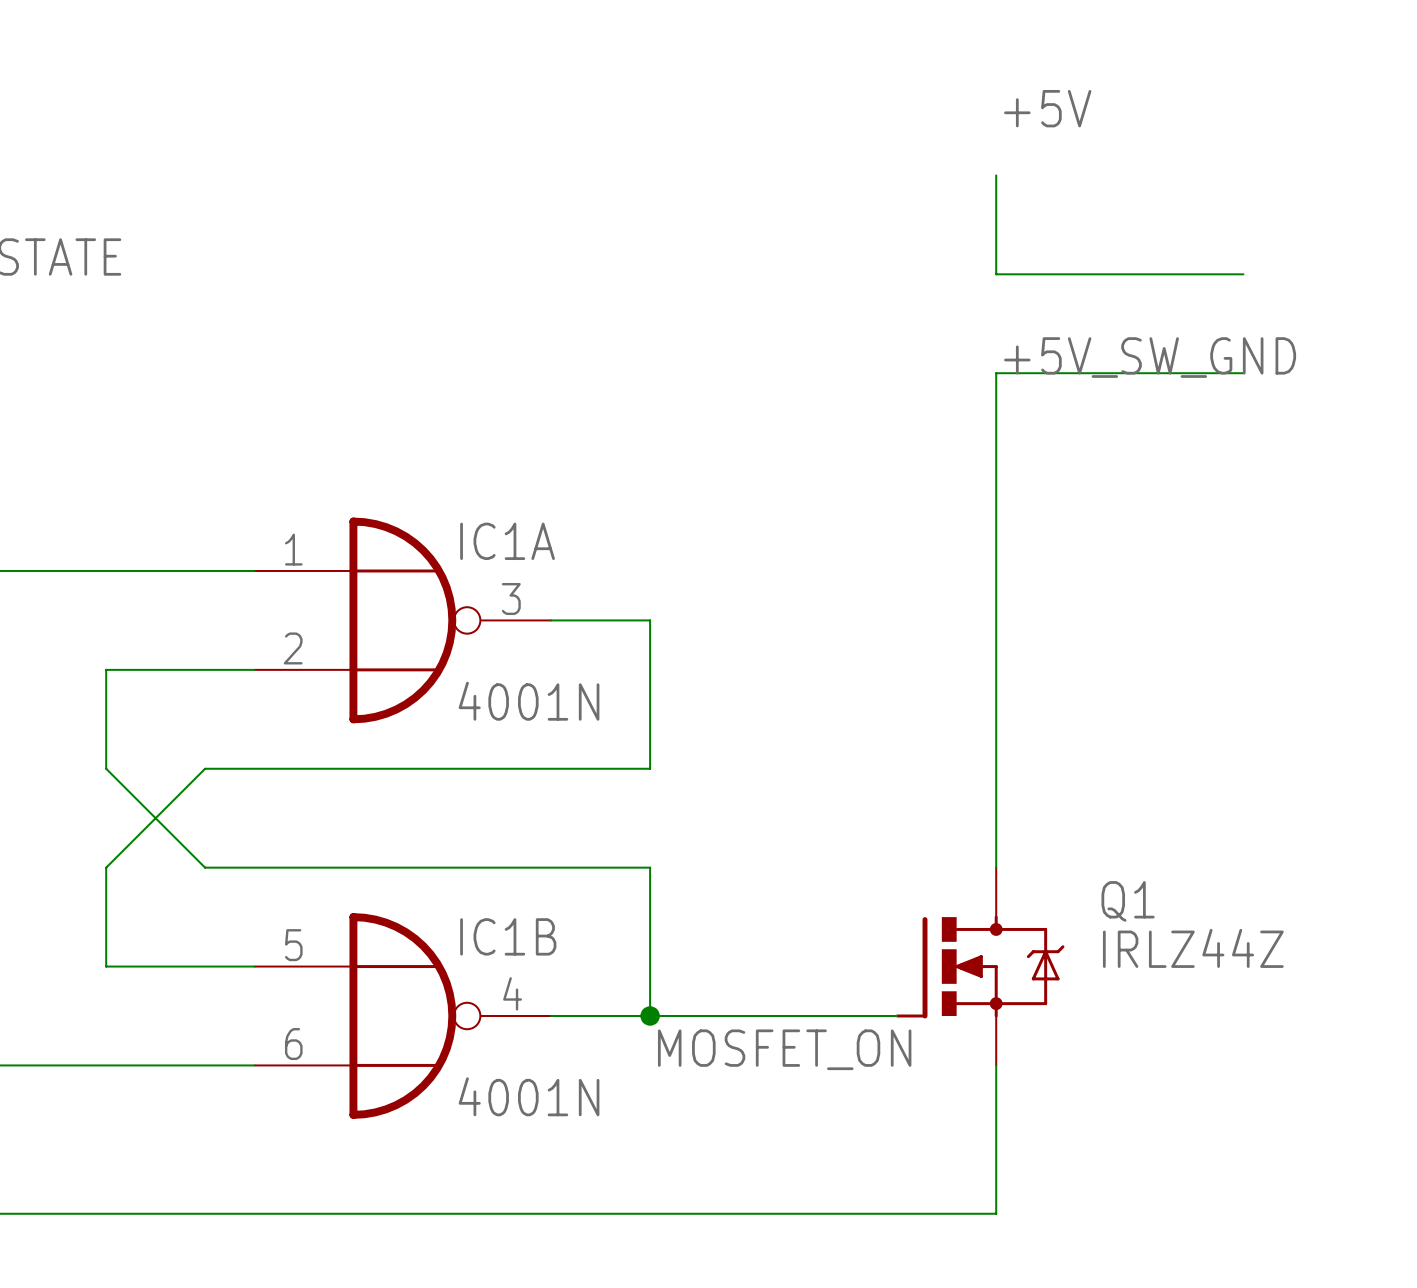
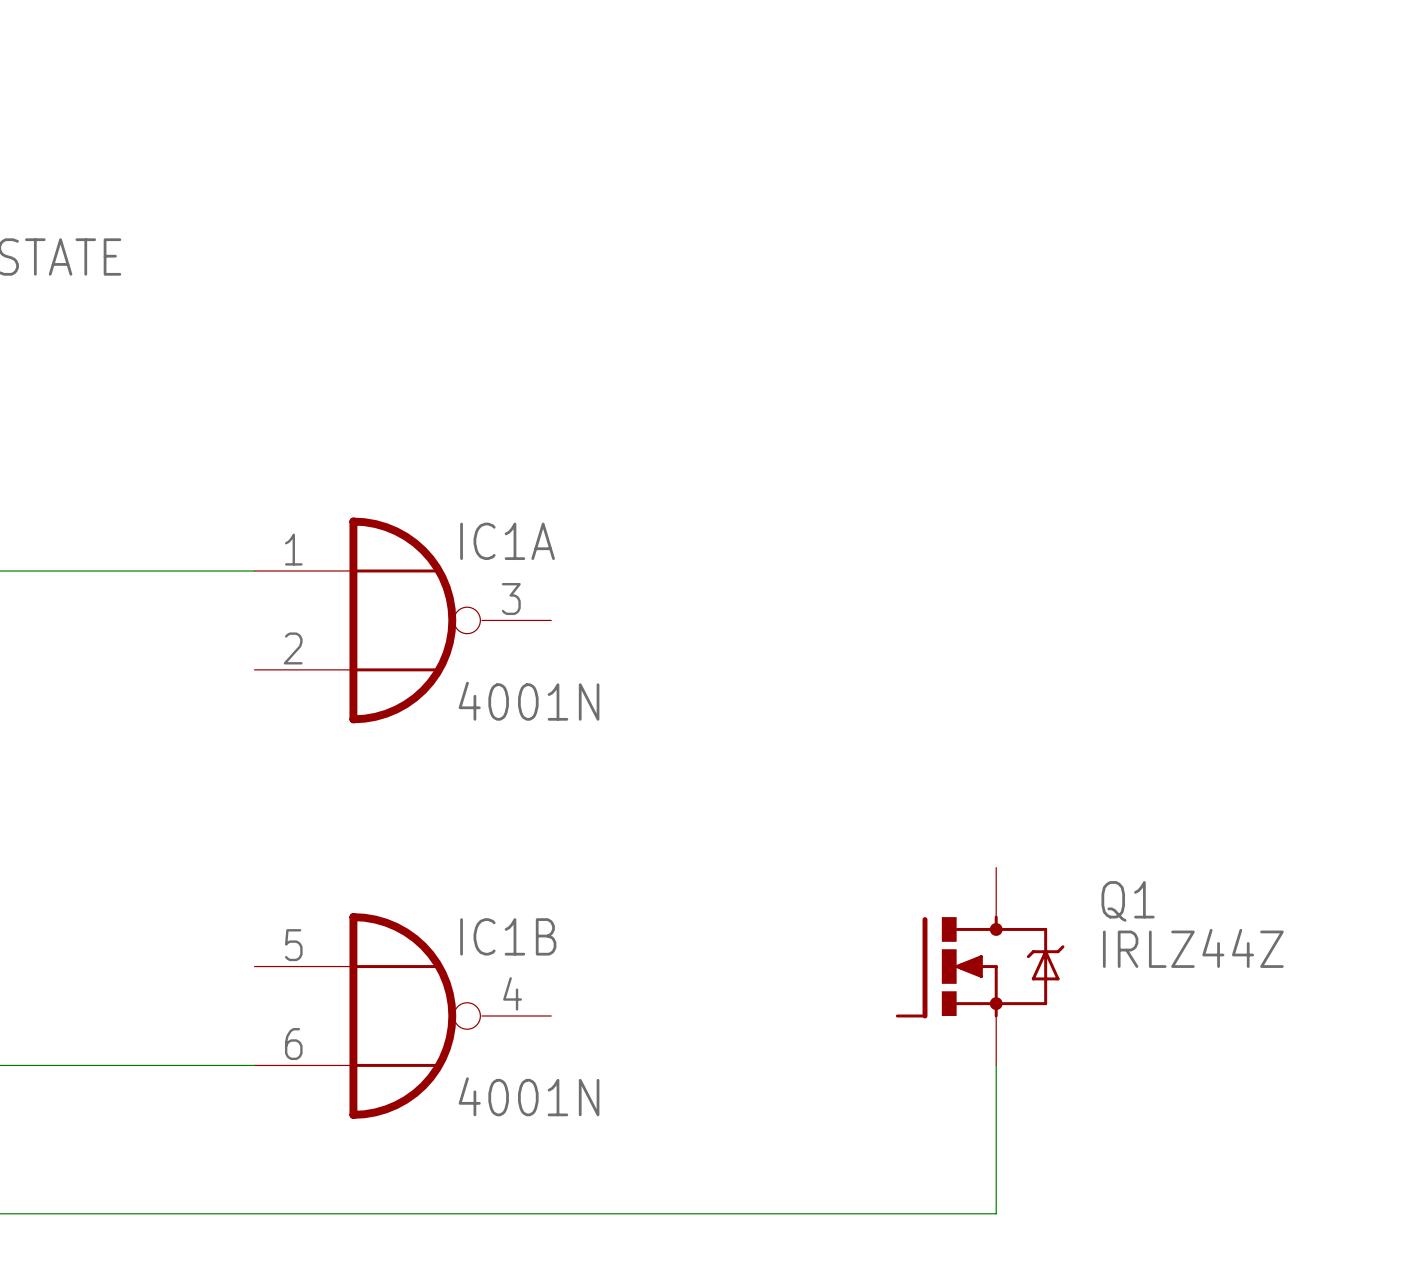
label: +5V (1047, 108) -> none
wire: (996, 175) (996, 274) (1243, 274) -> none
label: +5V_SW_GND (1150, 357) -> none
wire: (1243, 373) (996, 373) (996, 867) -> none
wire: (551, 620) (650, 620) (650, 768) (205, 768) (106, 867) (106, 966) (254, 966) -> none
wire: (254, 669) (106, 669) (106, 768) (205, 867) (650, 867) (650, 1015) -> none
wire: (551, 1015) (897, 1015) -> none
junction: (650, 1015) -> none
label: MOSFET_ON (784, 1049) -> none

